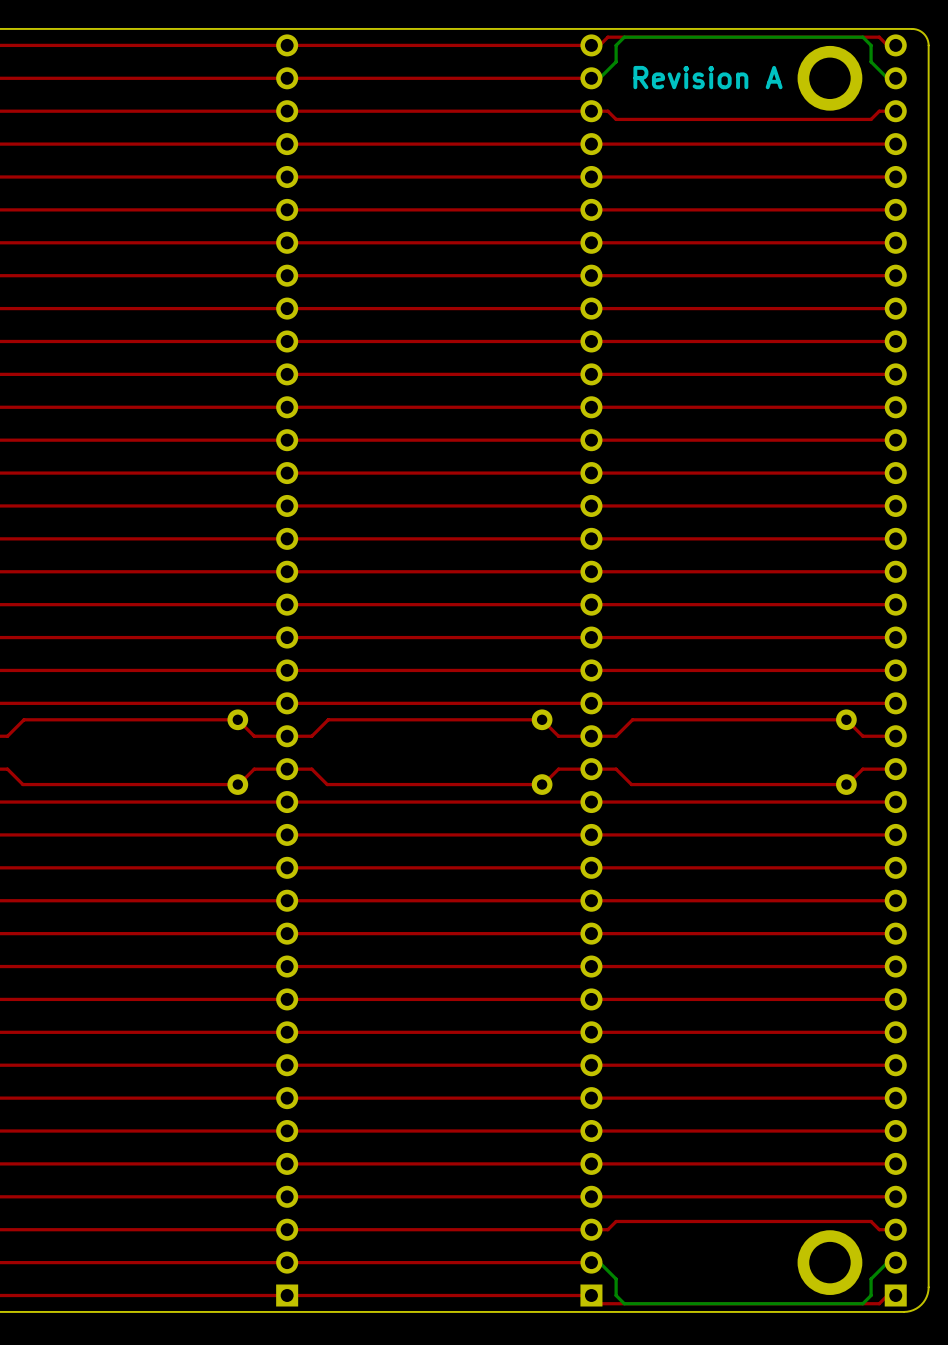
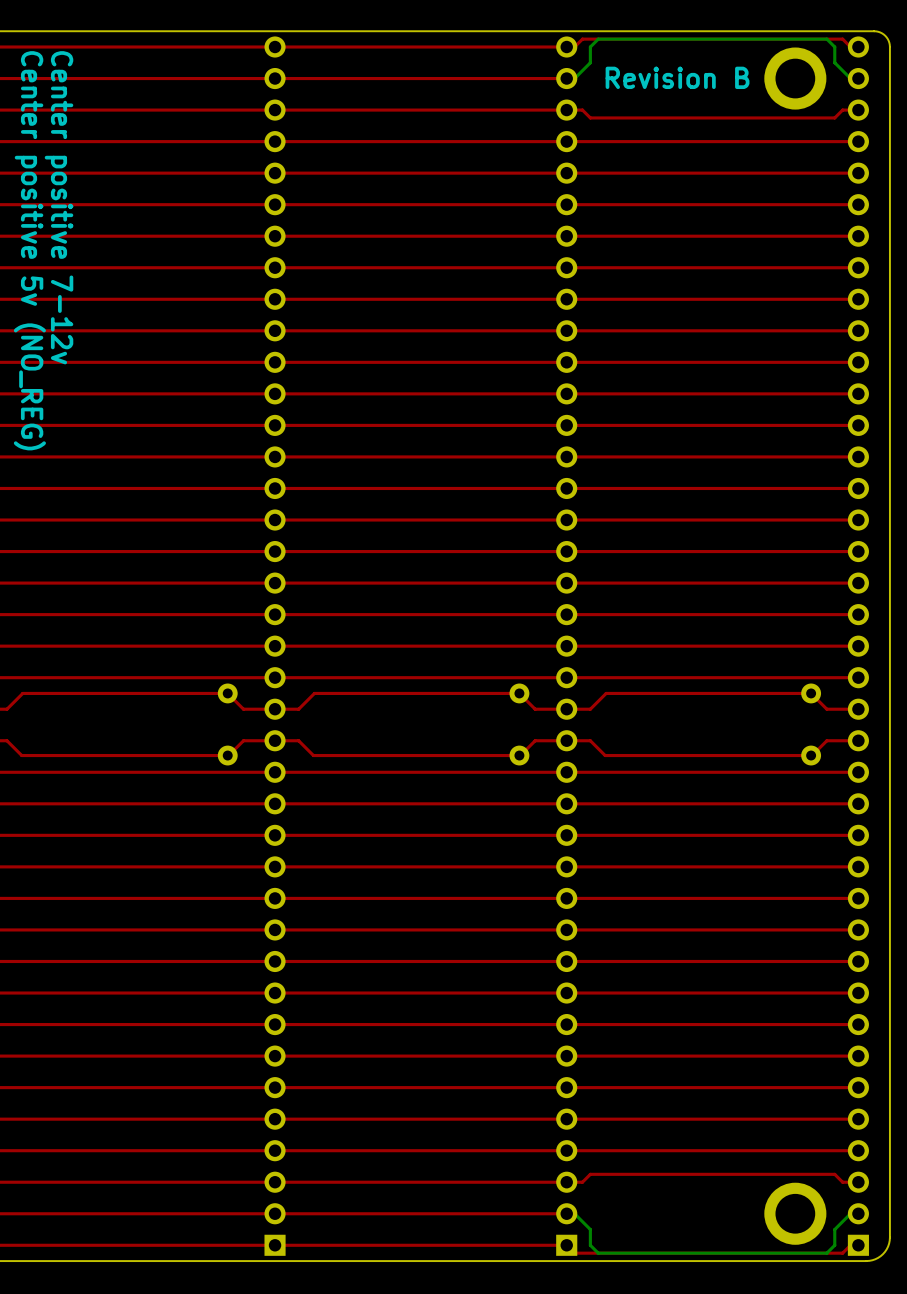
text: Revision A (707, 77) -> Revision B (677, 77)
text: none -> Center positive 7-12v (59, 207)
text: none -> Center positive 5v (NO_REG) (29, 250)

